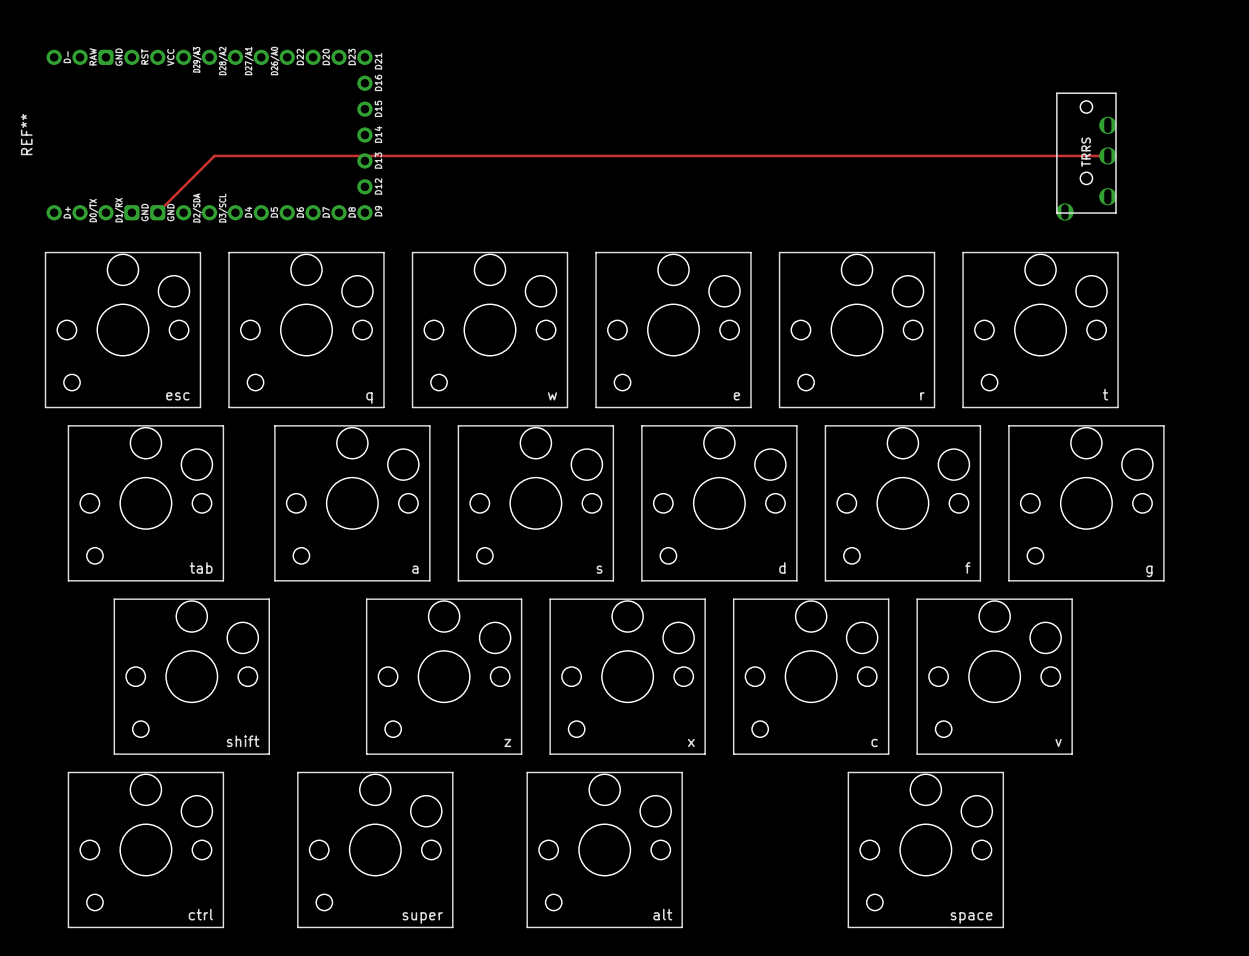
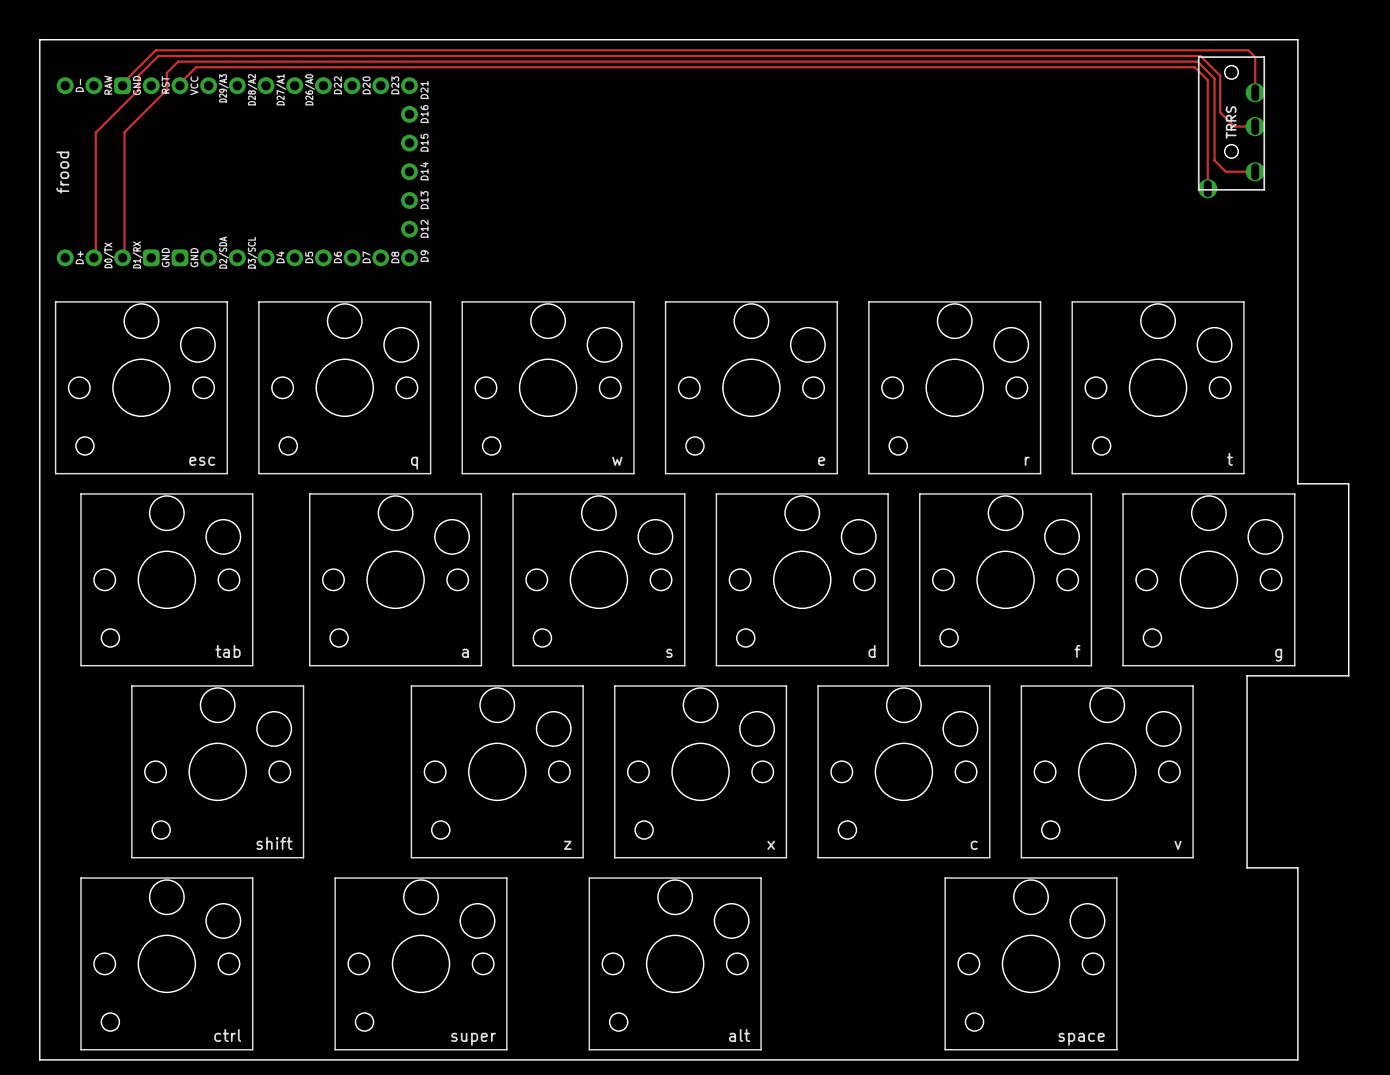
board edge: none -> (39, 39) (1297, 39) (1297, 483) (1348, 483) (1348, 675) (1247, 675) (1247, 867) (1297, 867) (1297, 1059) (39, 1059) (39, 39)
track: none -> (124, 81) (155, 50) (1248, 50) (1255, 57) (1255, 92)
track: none -> (181, 81) (196, 67) (1194, 67) (1207, 80) (1207, 188)
track: none -> (1255, 126) (1234, 126) (1220, 112) (1220, 75) (1200, 55) (158, 55) (138, 75) (138, 89) (95, 132) (95, 253)
REF** name: REF** (26, 134) -> frood (62, 172)
track: none -> (1255, 171) (1225, 171) (1214, 160) (1214, 78) (1197, 61) (178, 61) (166, 72) (166, 89) (124, 132) (124, 253)
track: (1107, 155) (214, 155) (157, 212) -> none
part position: (1086, 156) -> (1231, 127)

